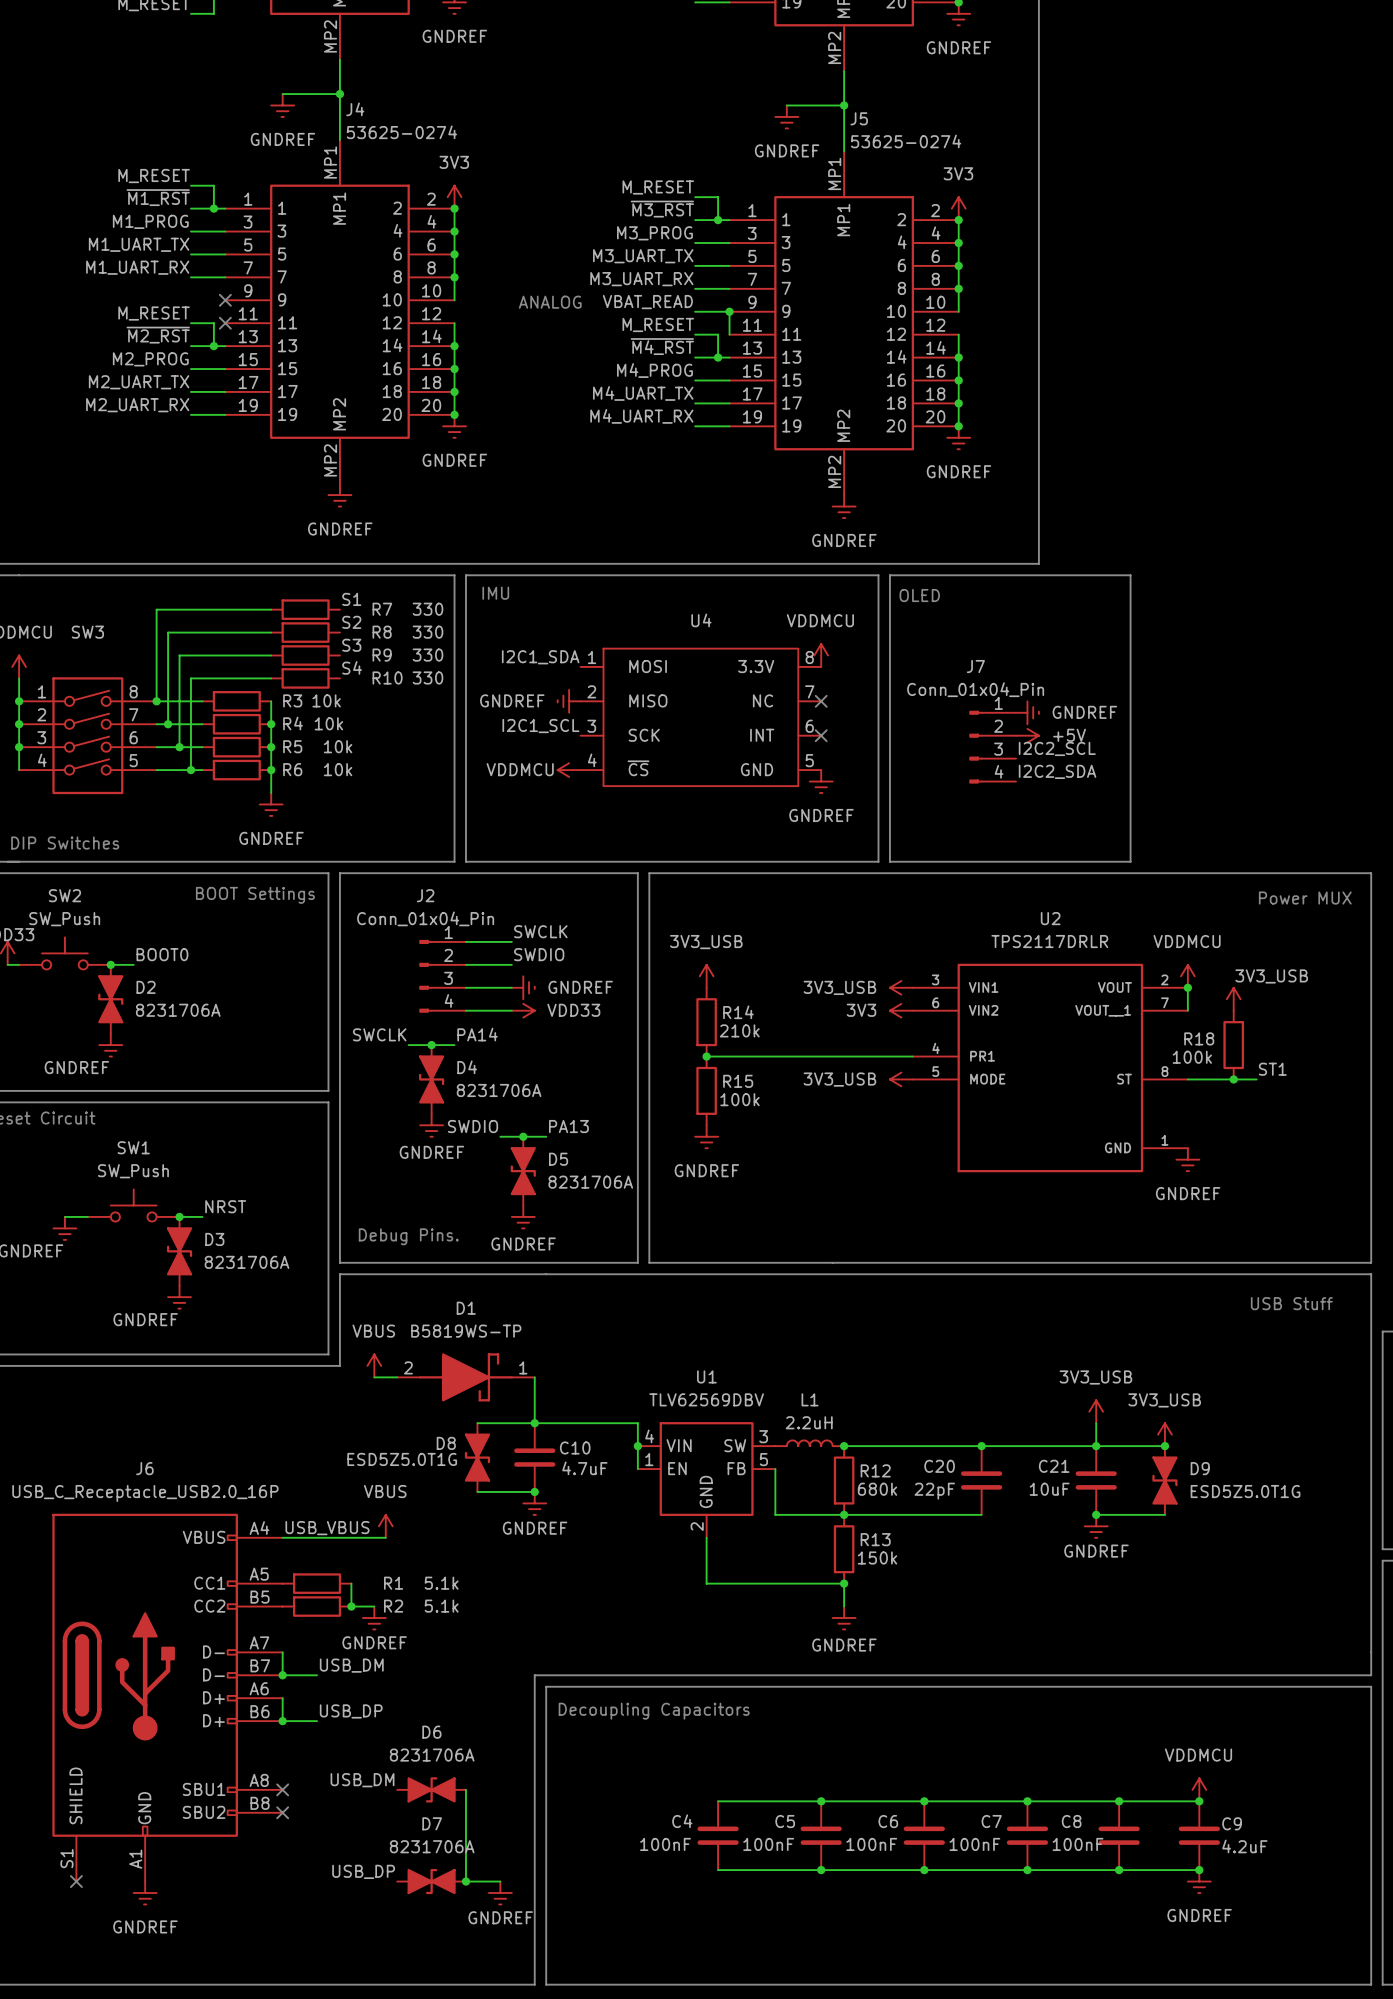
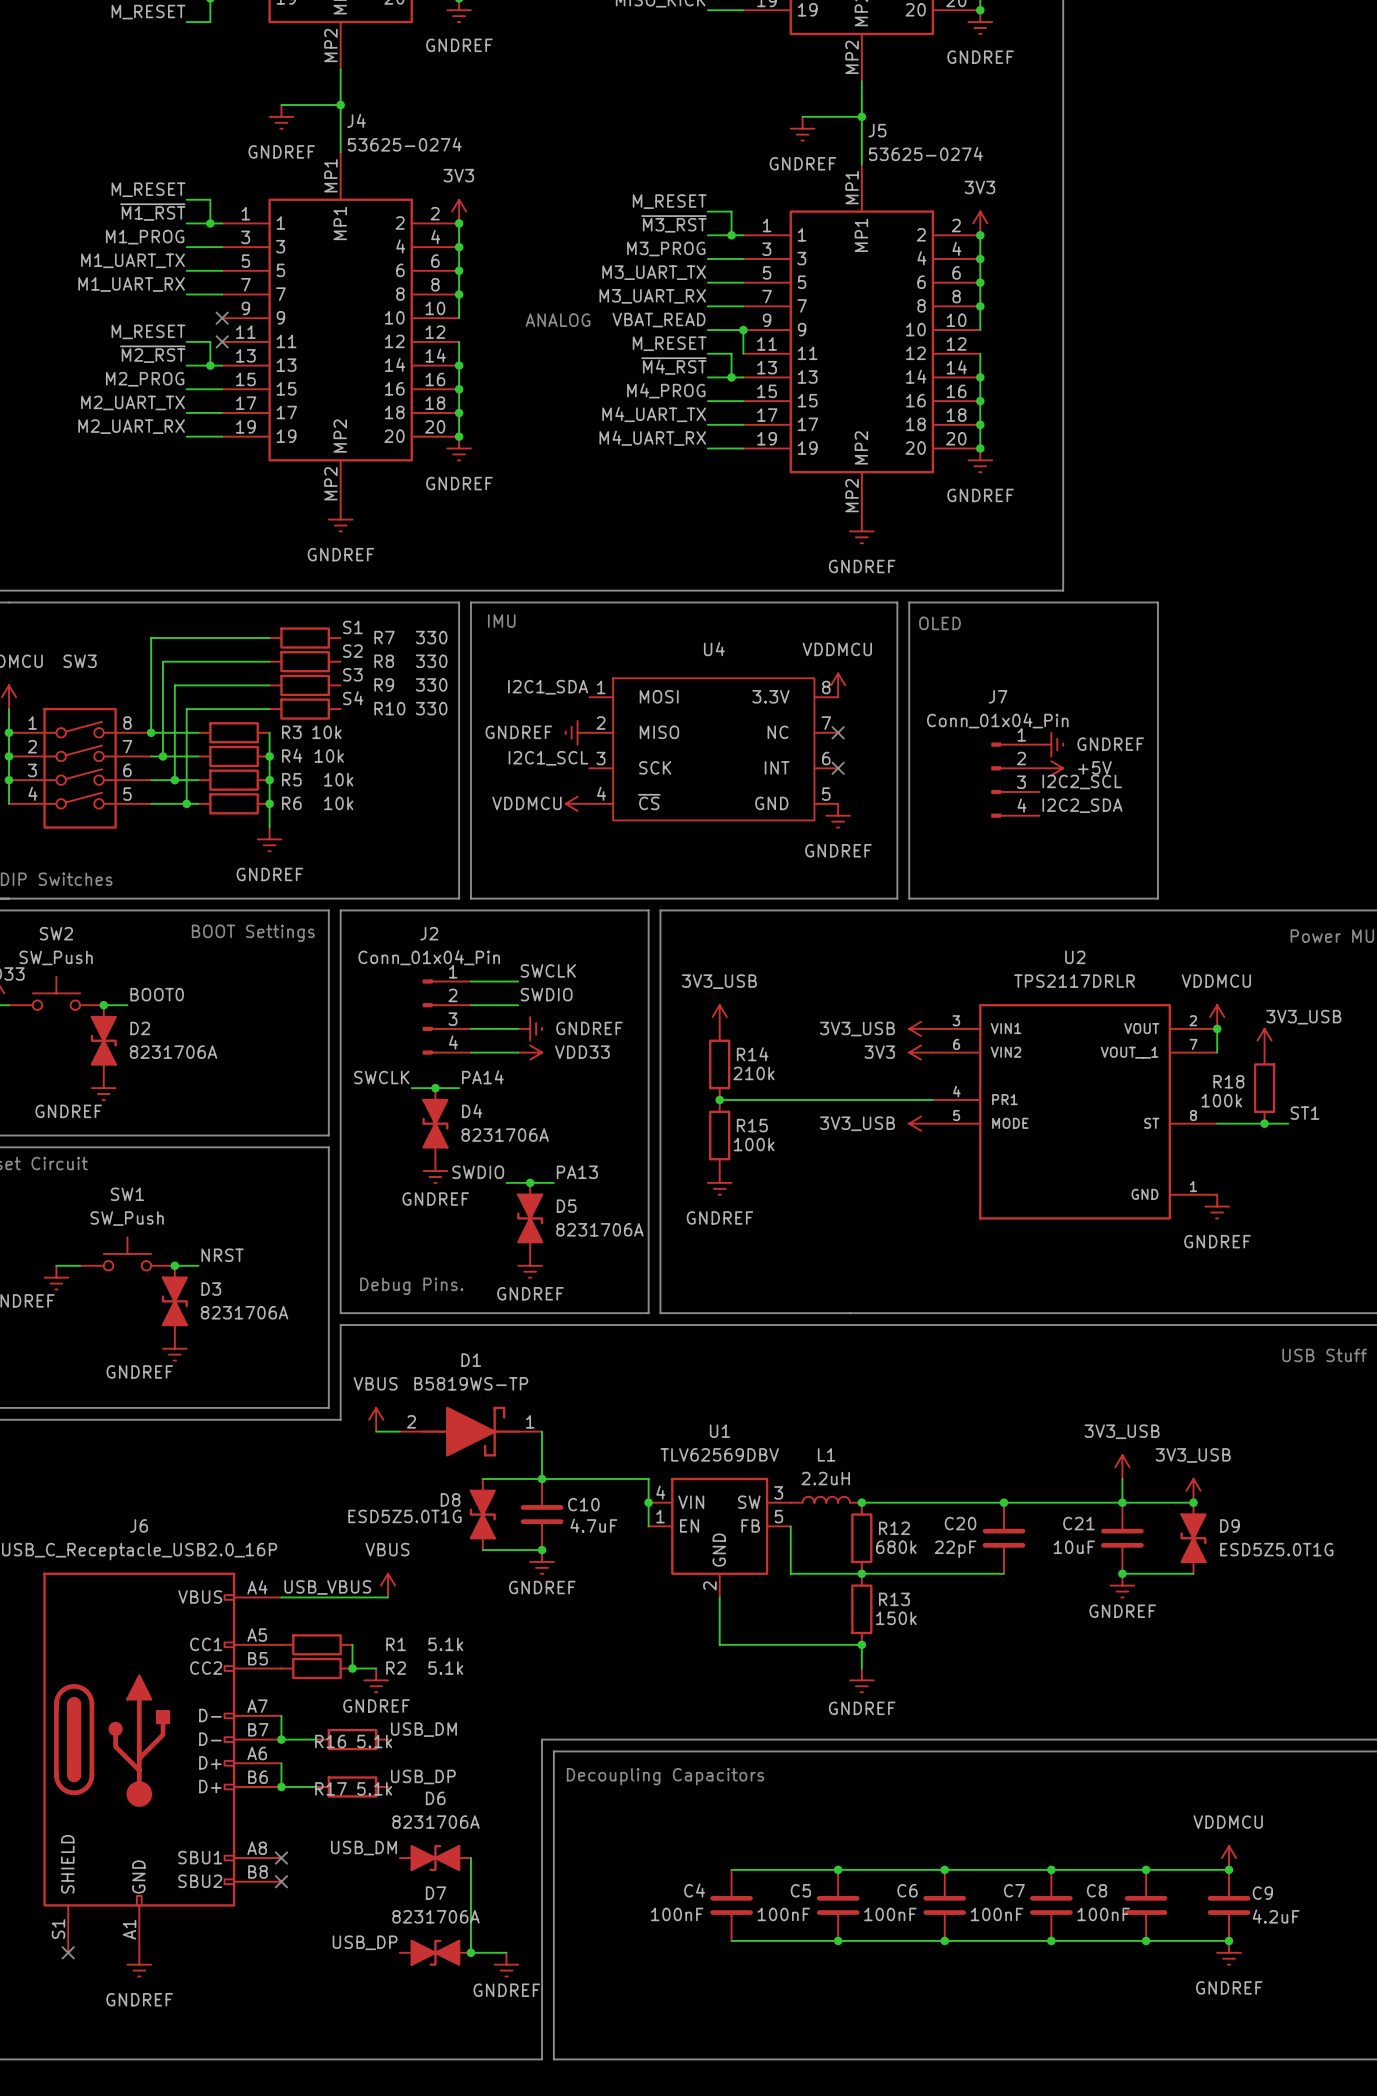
label position: USB_DM (351, 1665) -> USB_DM (423, 1729)
R16: none -> 5.1k (352, 1739)
label position: USB_DP (351, 1711) -> USB_DP (423, 1776)
R17: none -> 5.1k (352, 1786)

